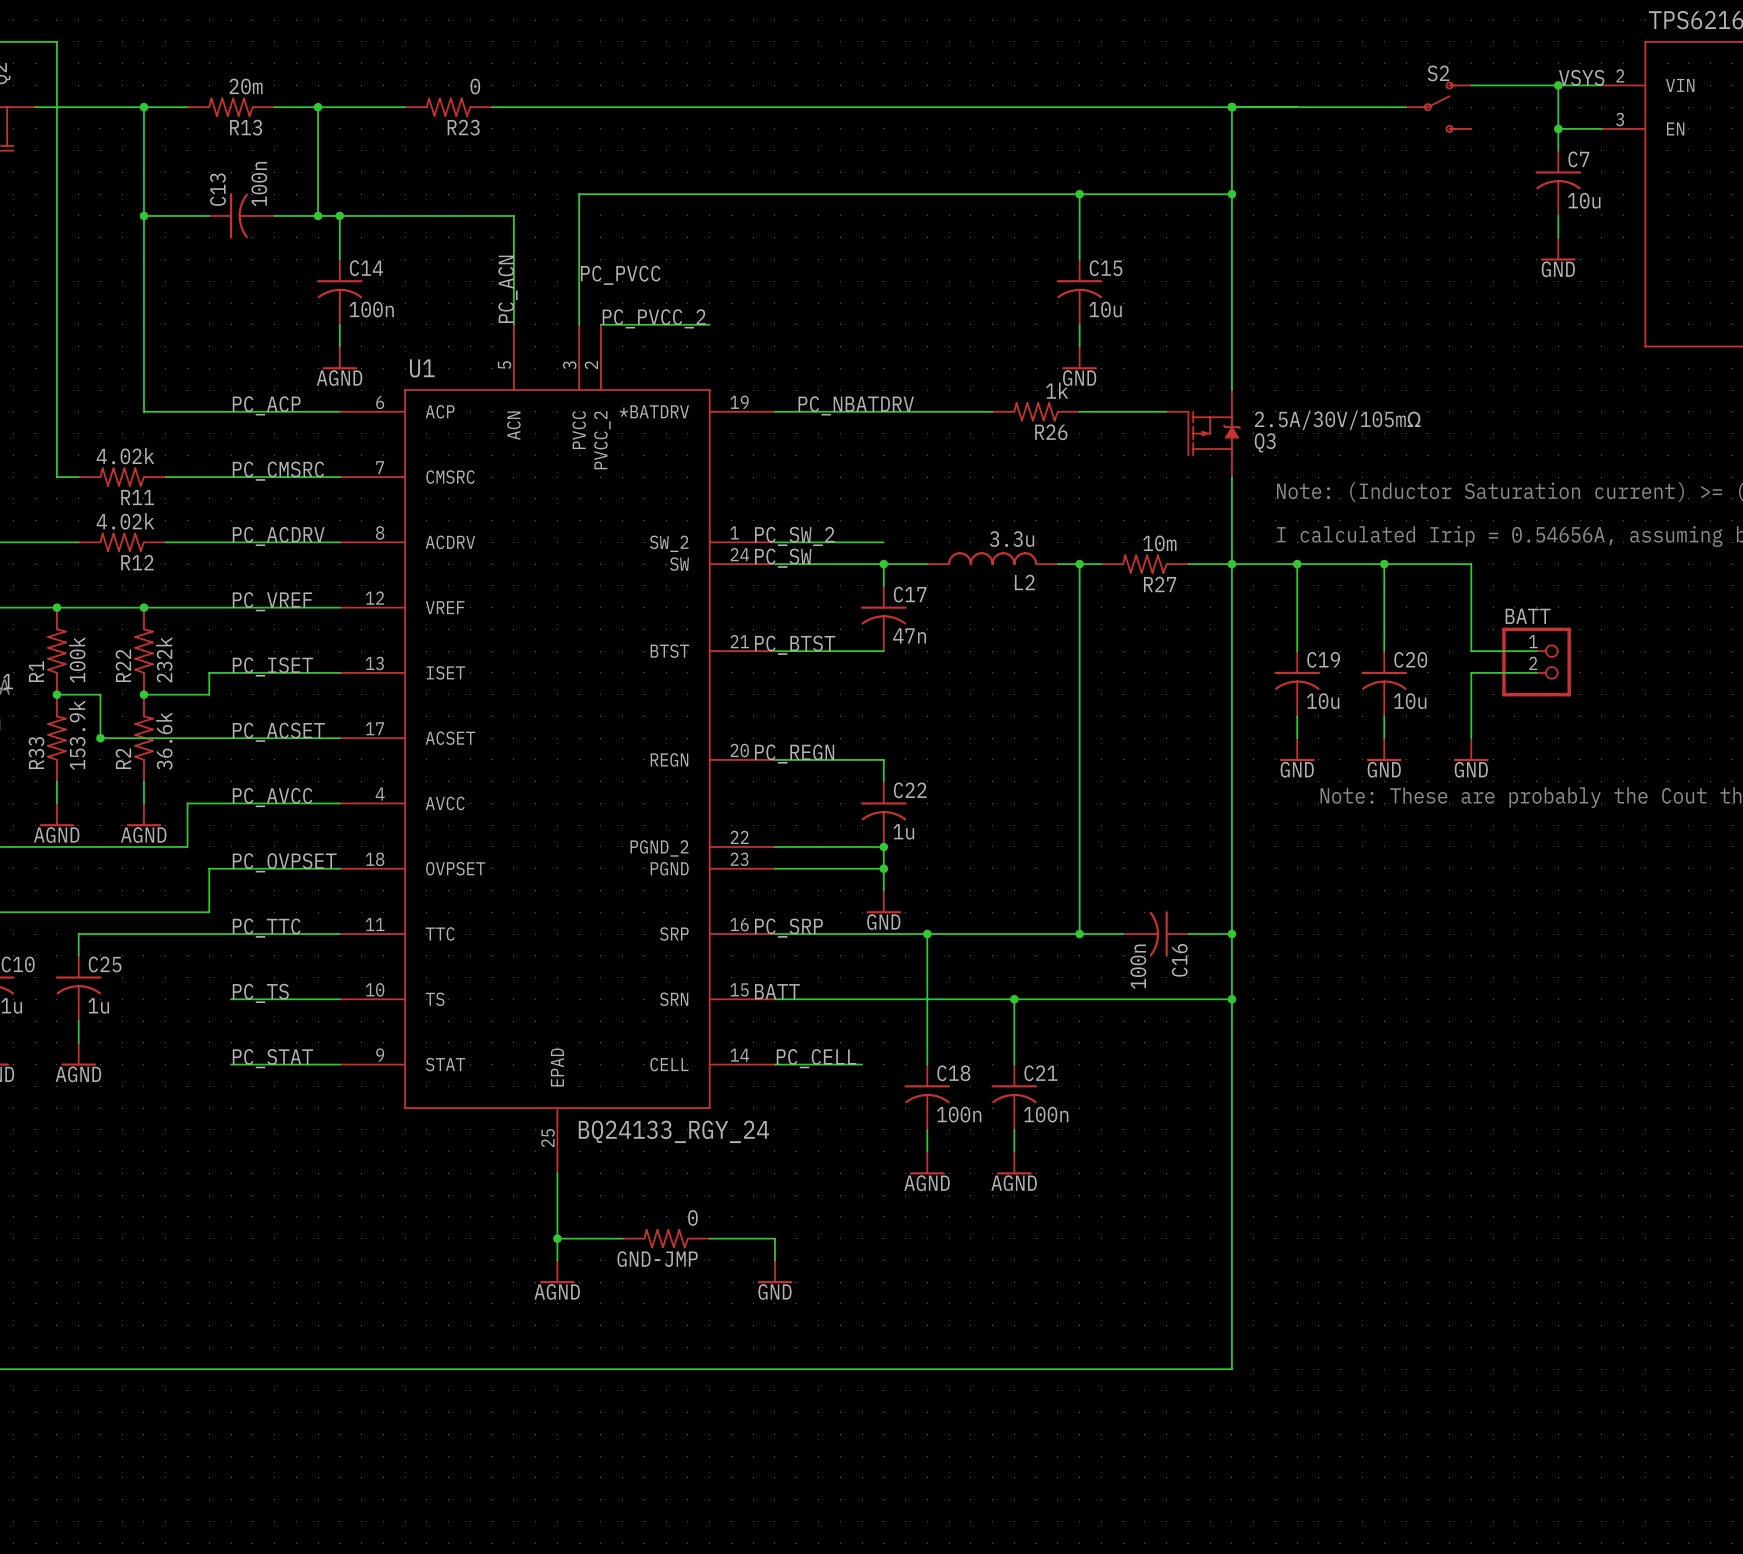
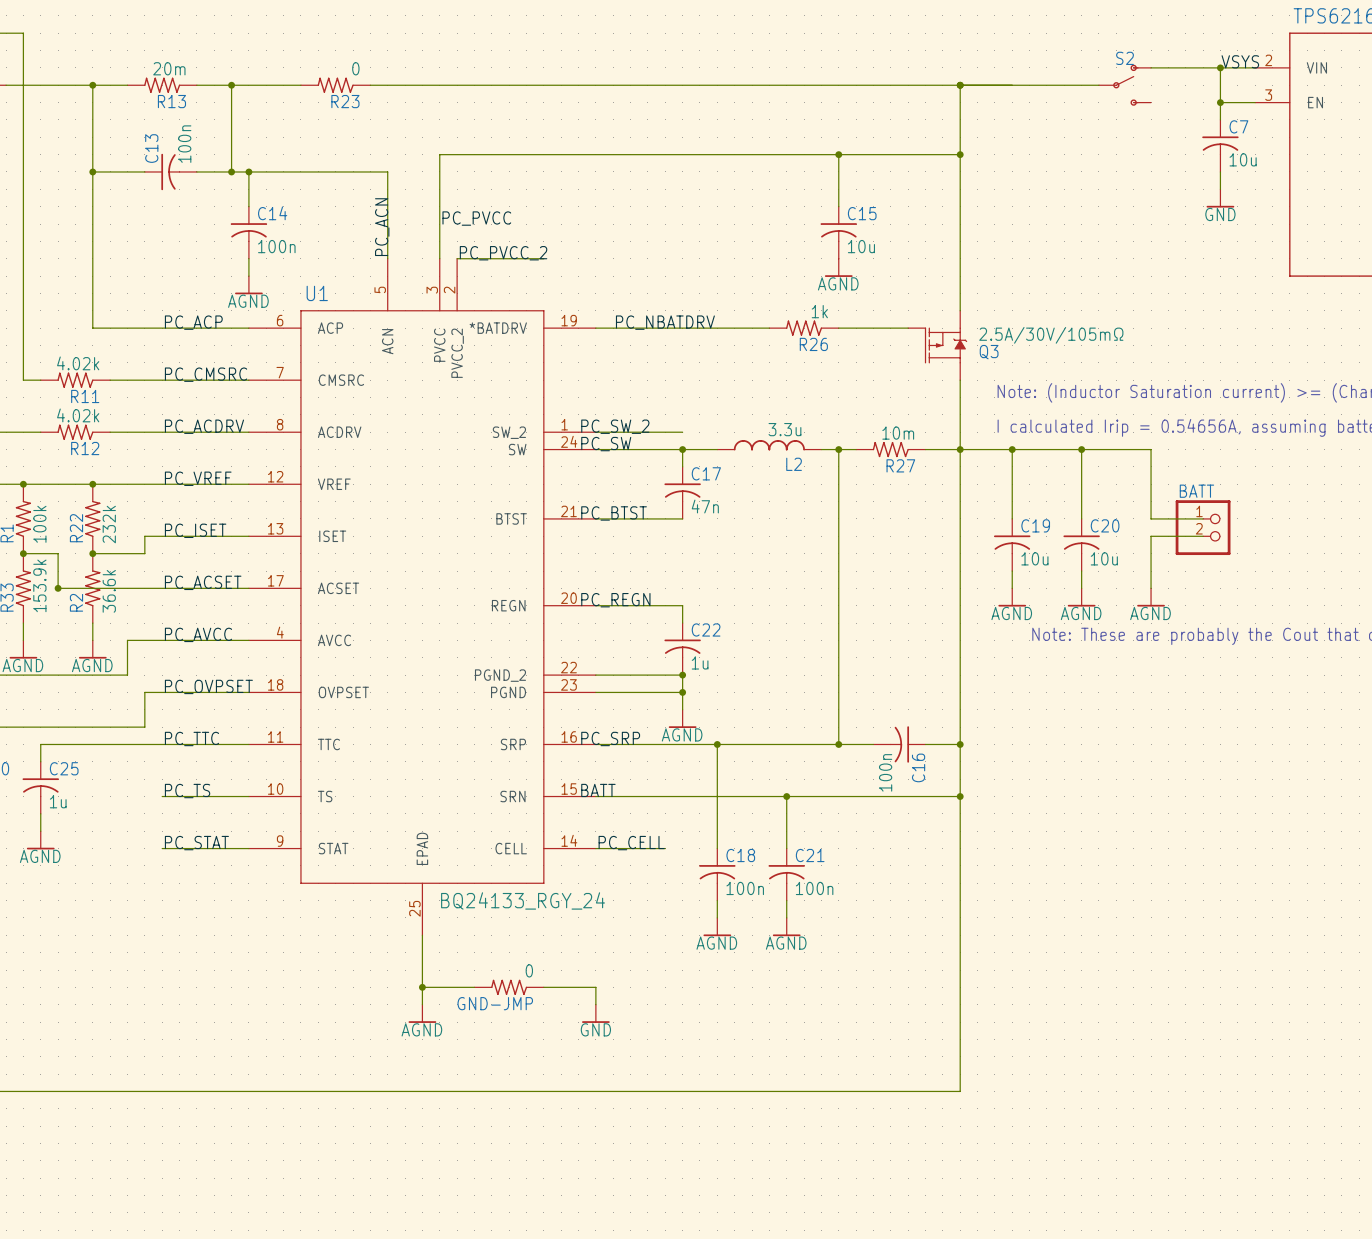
power symbol: none -> AGND (838, 267)
power symbol: GND (1079, 357) -> none
power symbol: GND (1297, 749) -> AGND (1012, 597)
power symbol: GND (1384, 749) -> AGND (1081, 597)
power symbol: GND (1471, 749) -> AGND (1151, 597)
power symbol: GND (883, 901) -> AGND (682, 718)

